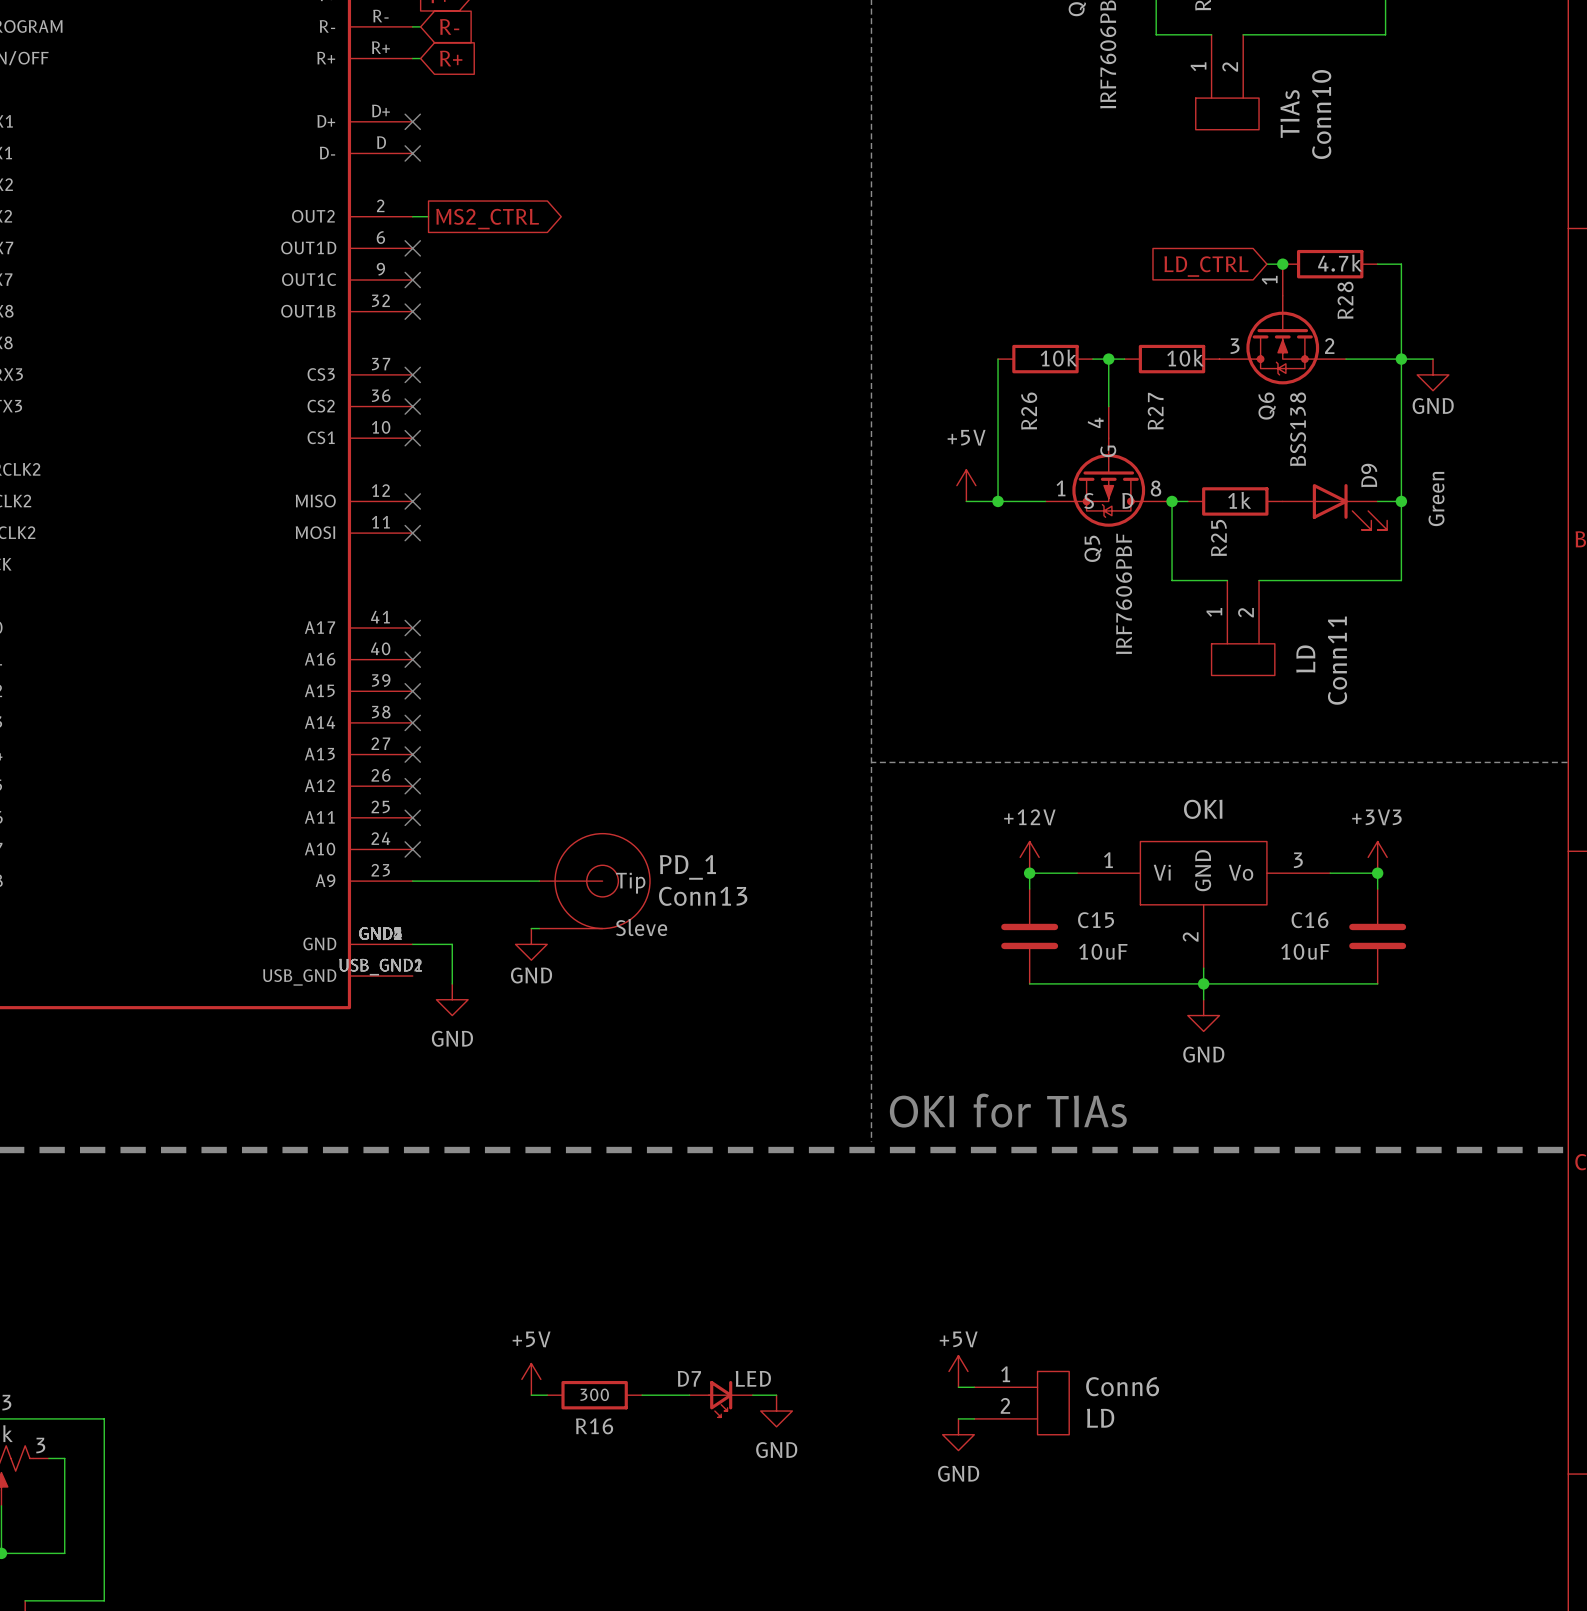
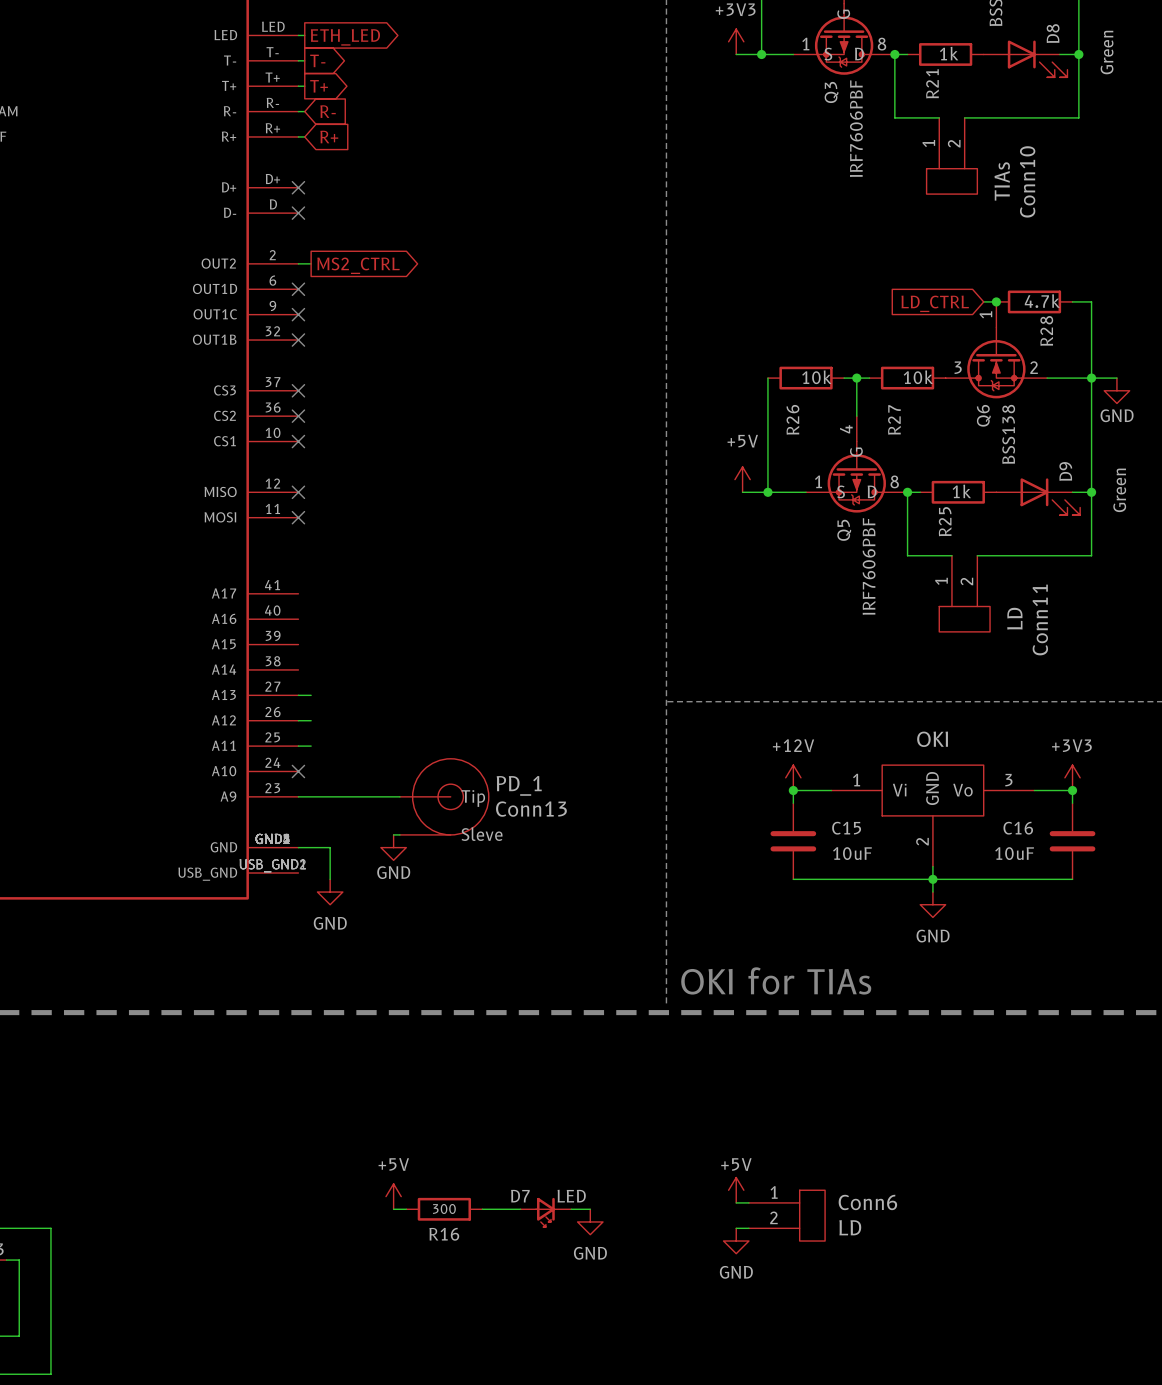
no-connect mark: (412, 628) -> none
no-connect mark: (412, 659) -> none
no-connect mark: (412, 691) -> none
no-connect mark: (412, 722) -> none
wire: none -> (298, 695) (311, 695)
no-connect mark: (412, 754) -> none
wire: none -> (298, 720) (311, 720)
no-connect mark: (412, 786) -> none
wire: none -> (298, 746) (311, 746)
no-connect mark: (412, 817) -> none

